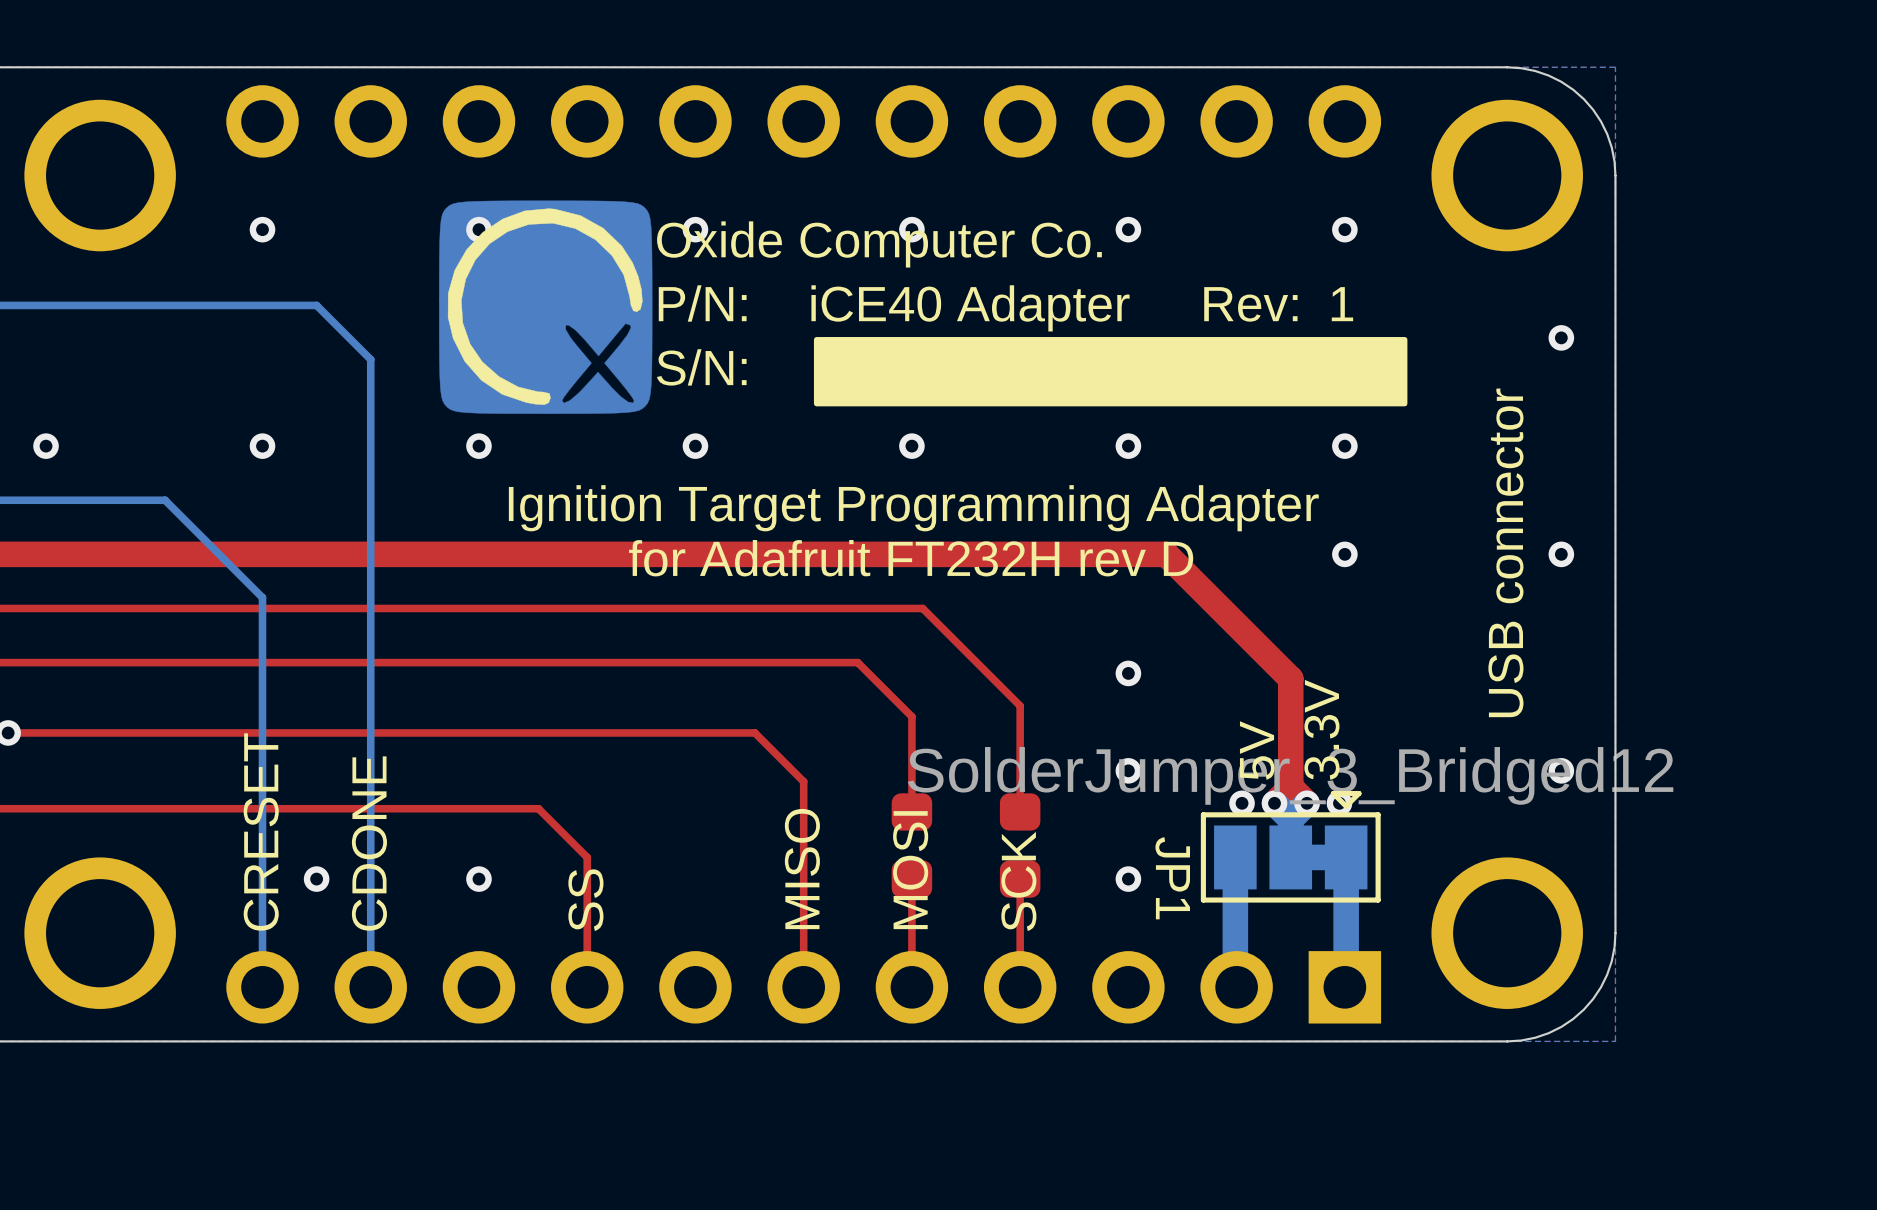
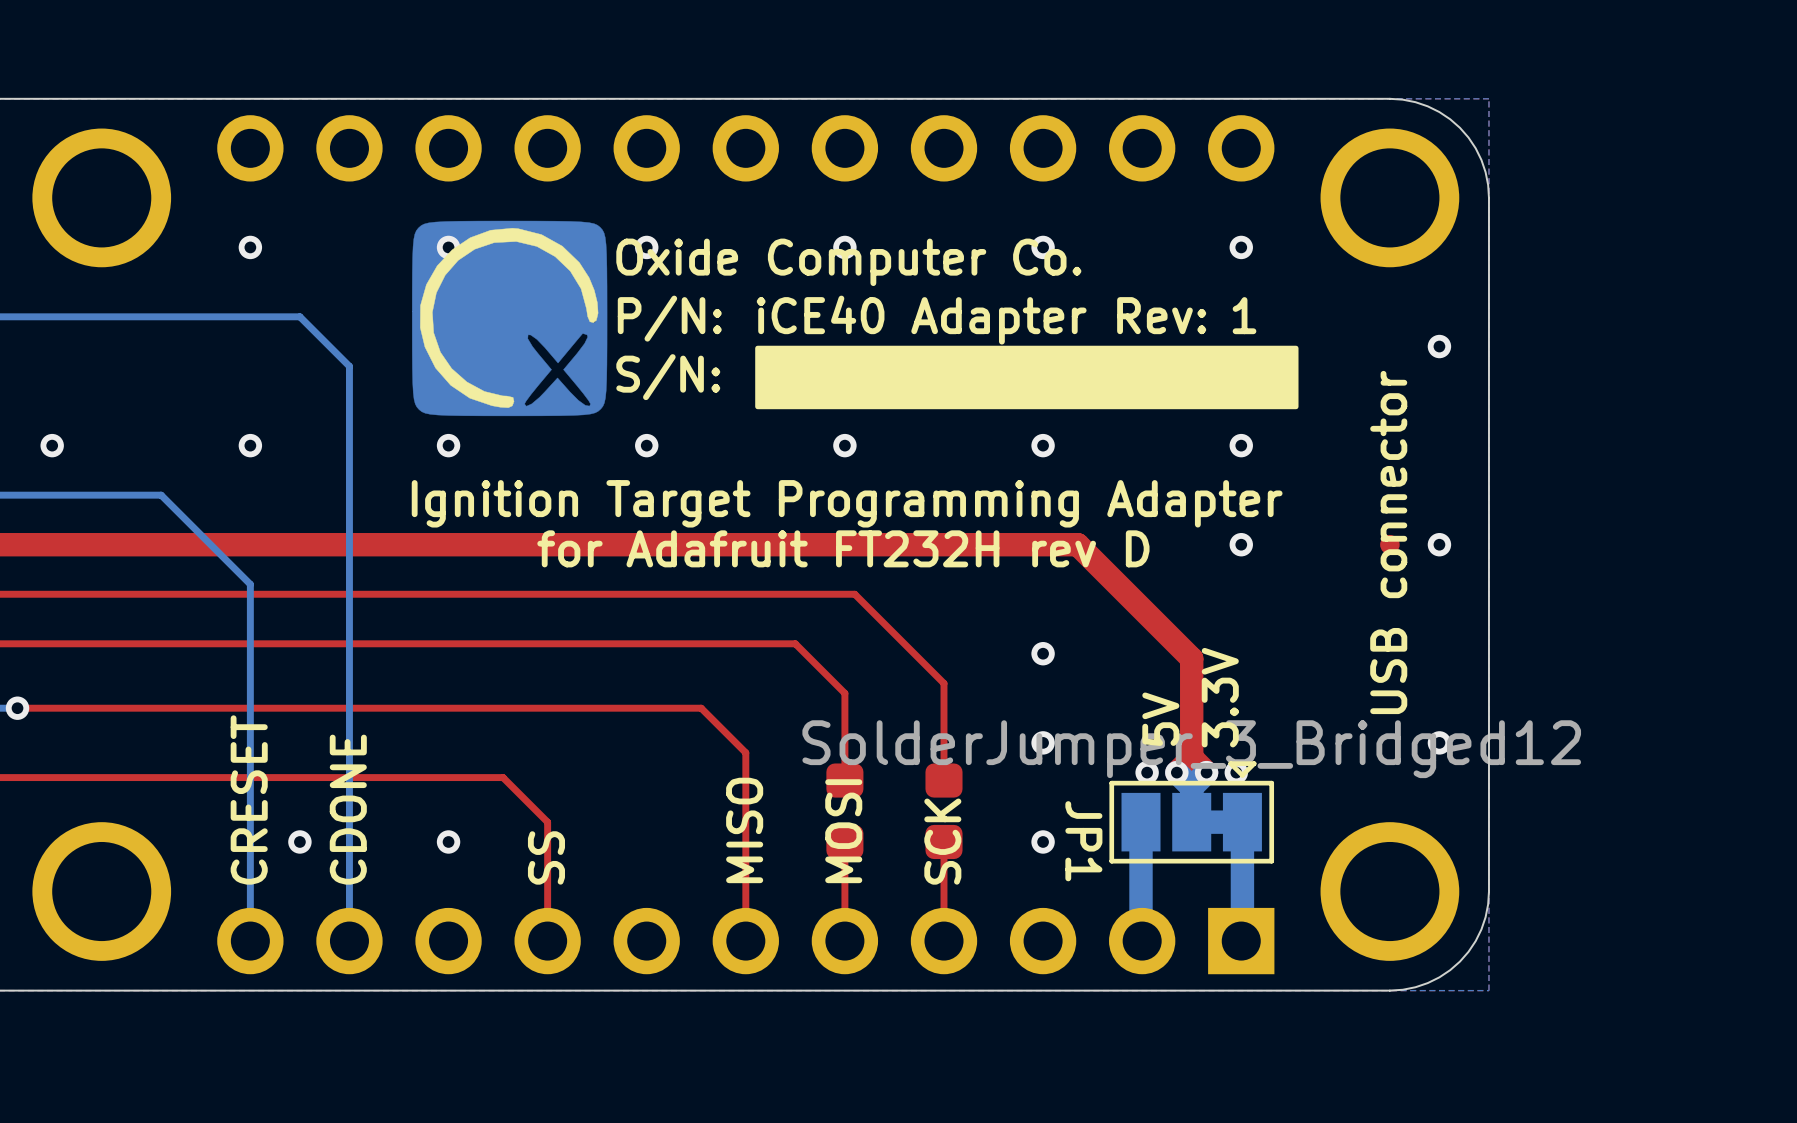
part: none -> (1389, 544)

